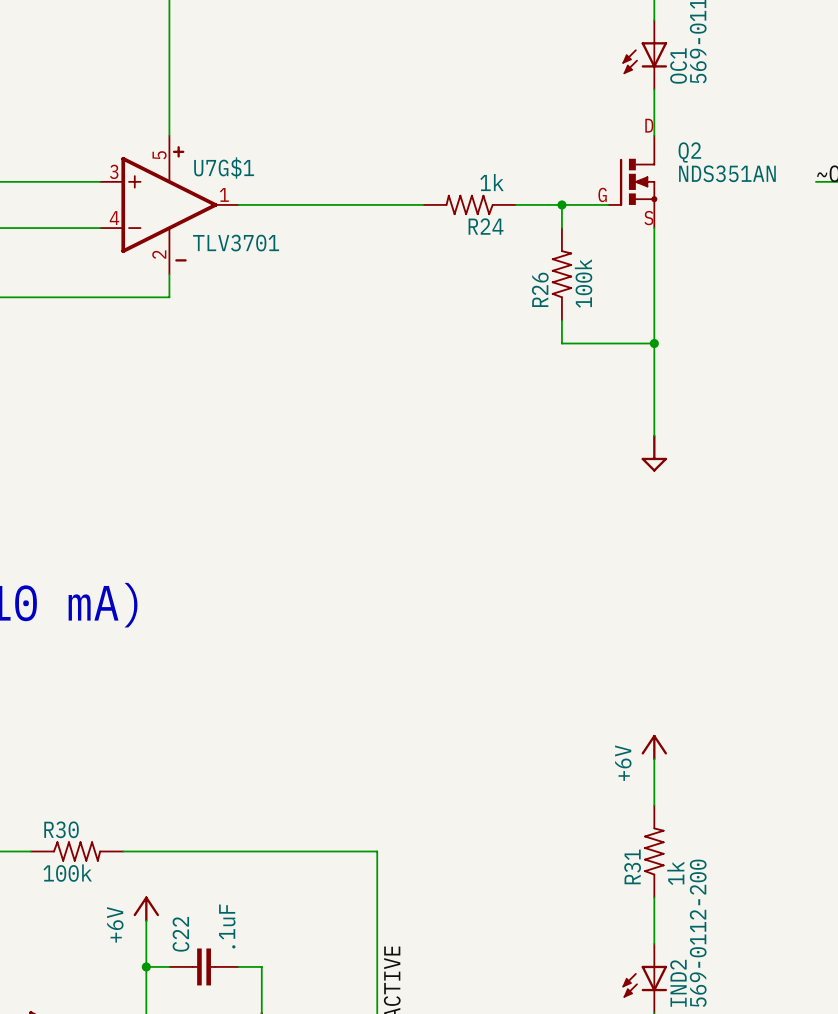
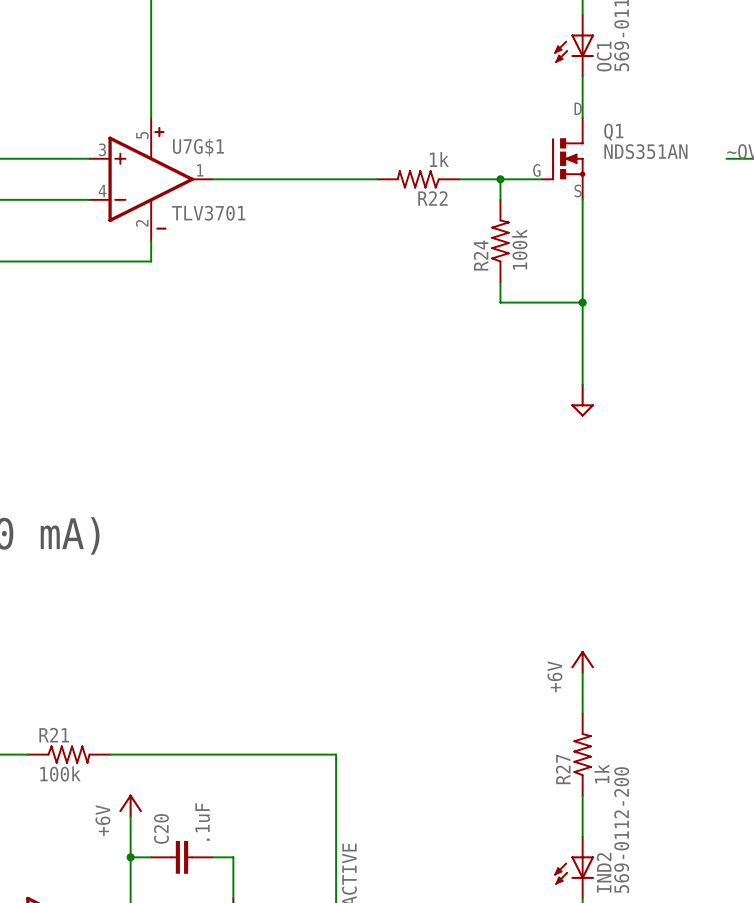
Q2 name: Q2 (689, 152) -> Q1 (613, 132)
R24 name: R24 (486, 226) -> R22 (432, 198)
R26 name: R26 (540, 289) -> R24 (481, 255)
R30 name: R30 (61, 829) -> R21 (54, 735)
R31 name: R31 (632, 866) -> R27 (563, 769)
C22 name: C22 (180, 934) -> C20 (161, 828)

